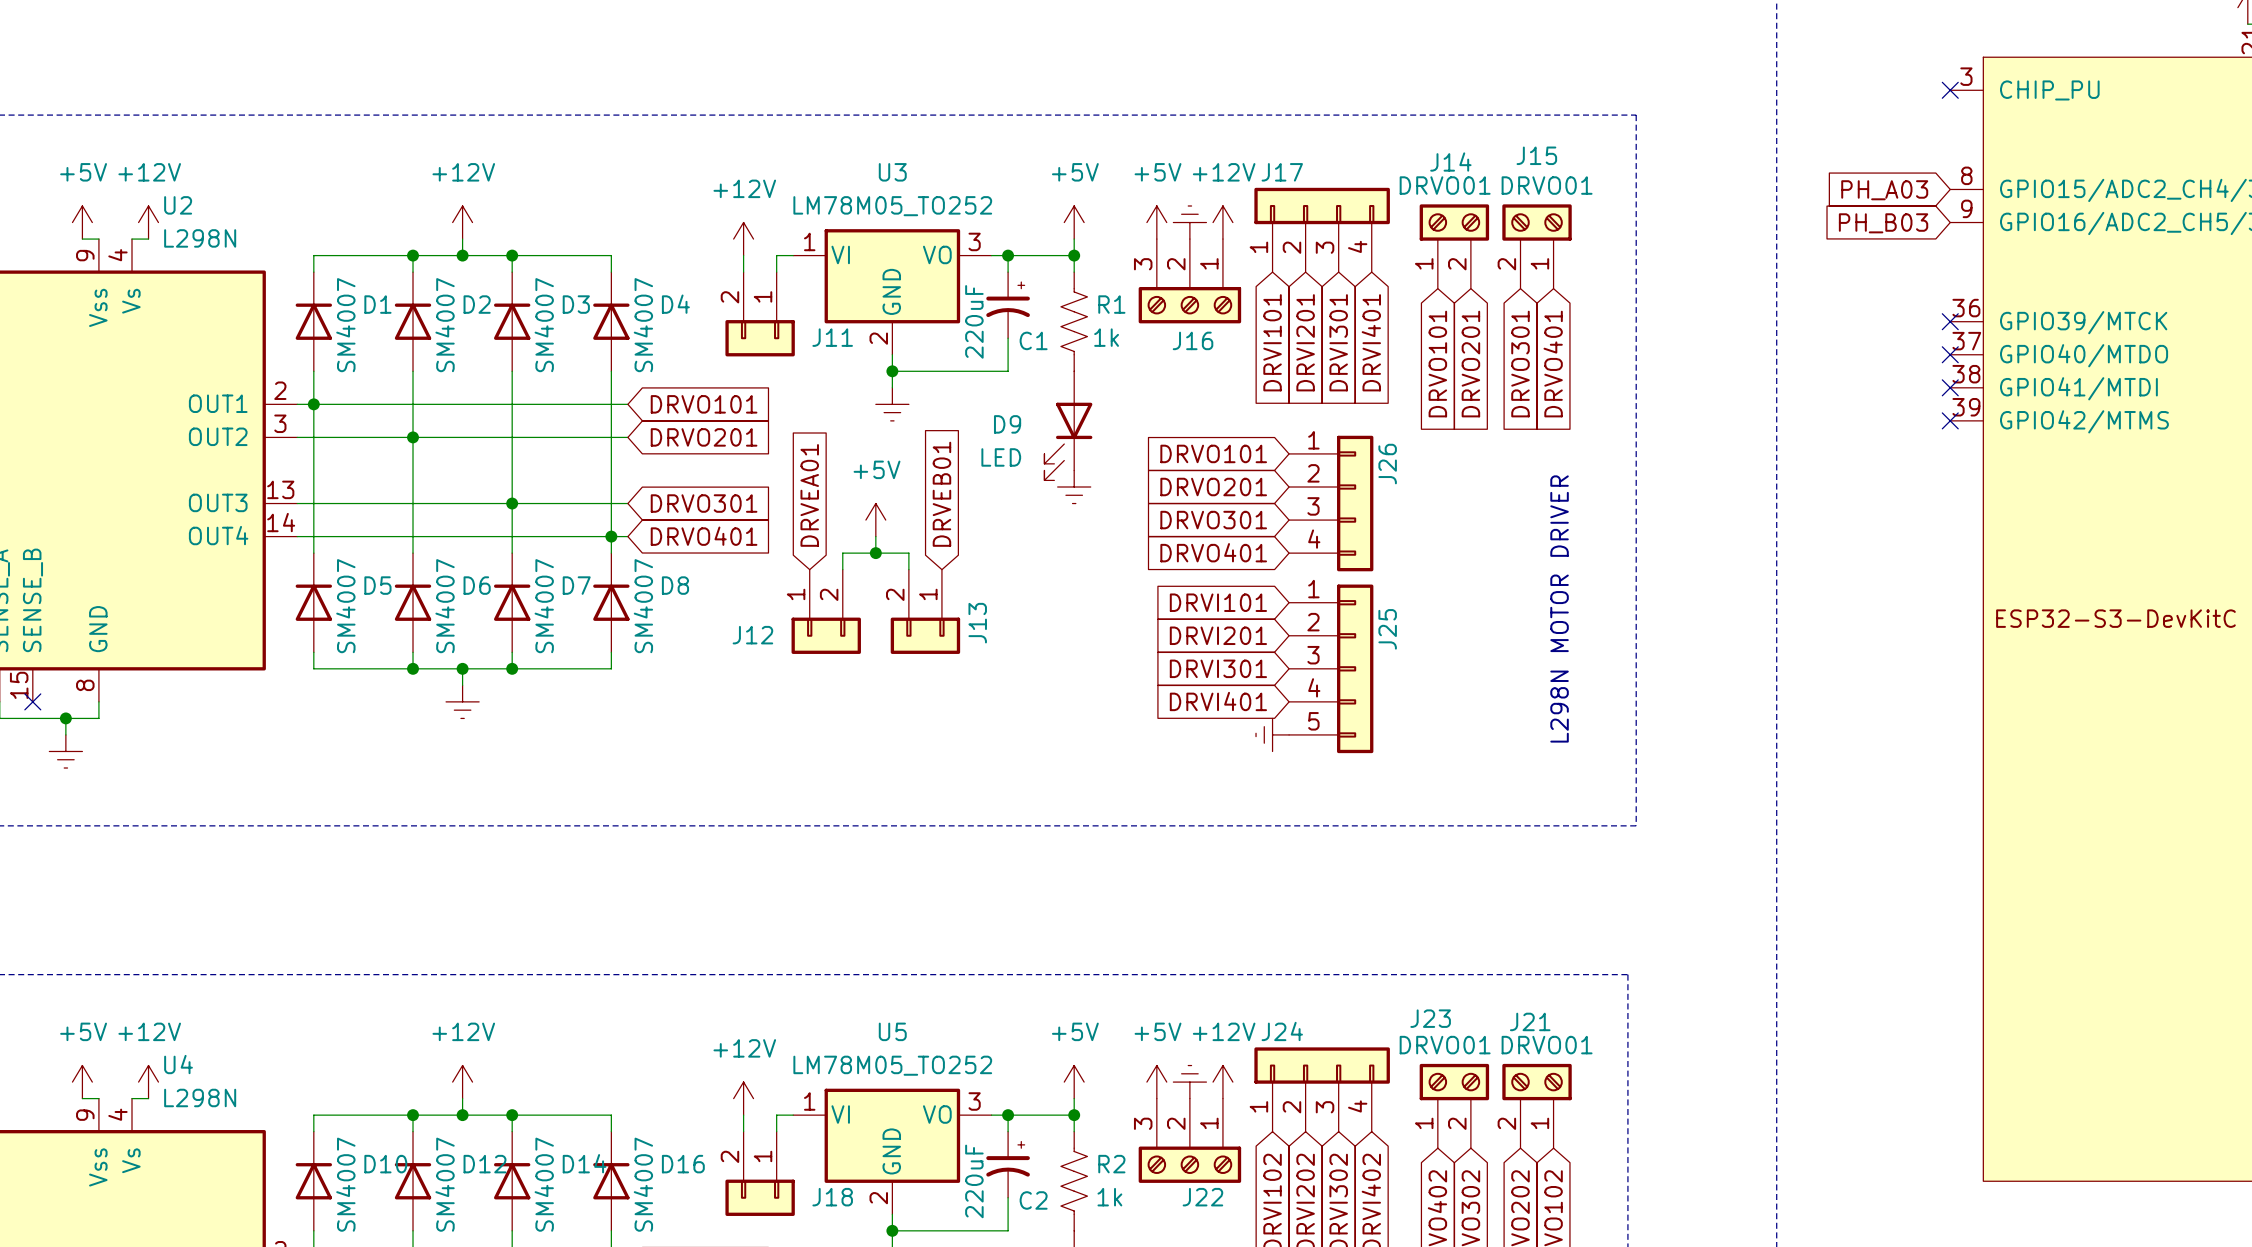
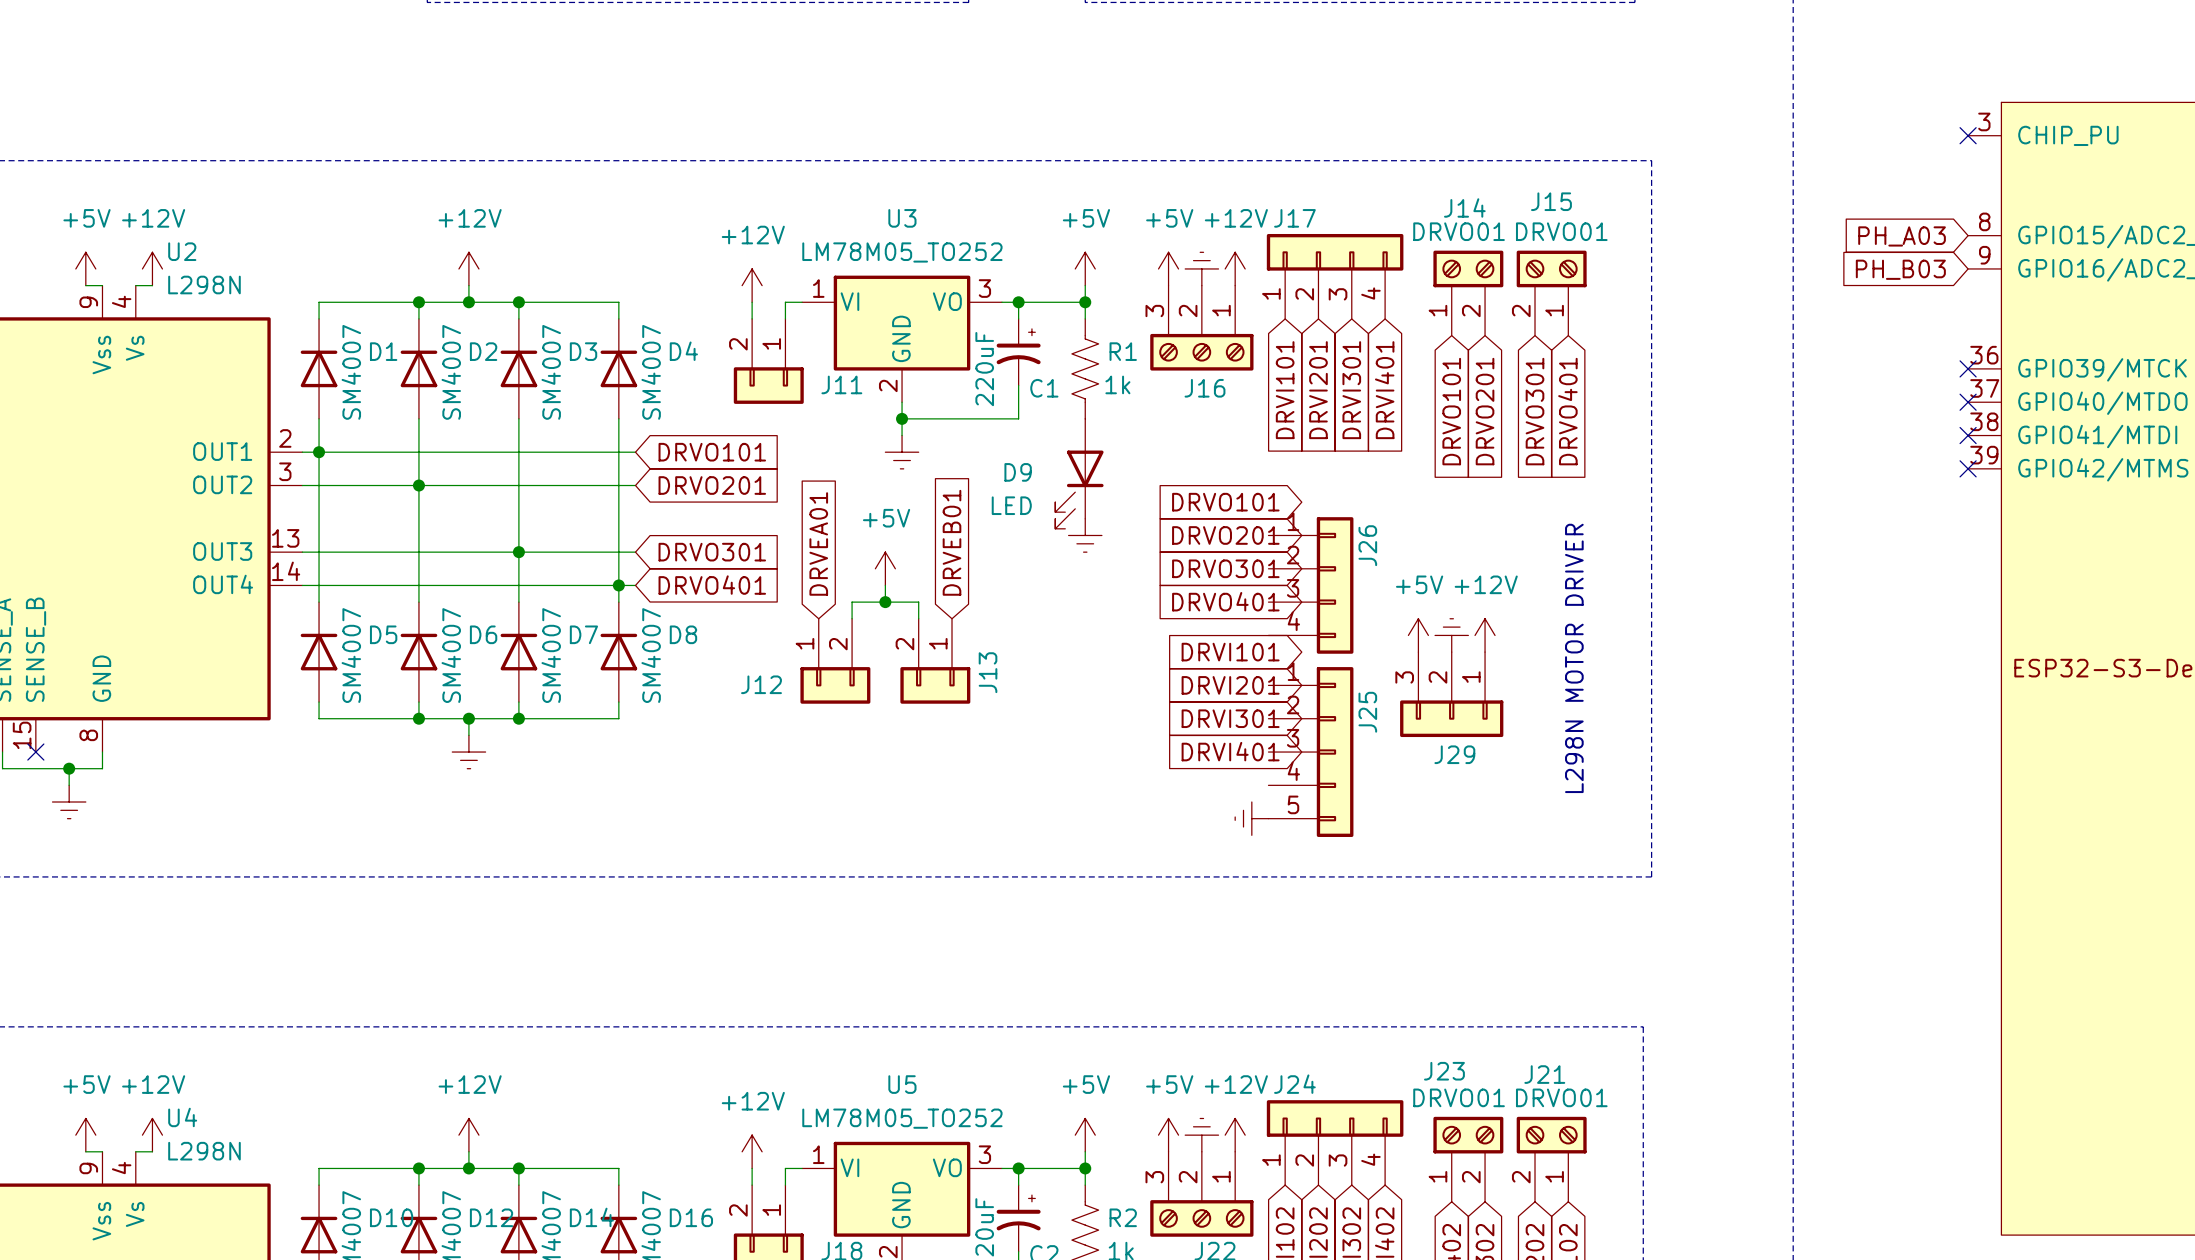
J26 position: (1331, 503) -> (1310, 585)
power symbol: none -> +5V (1418, 635)
power symbol: none -> (1451, 635)
power symbol: none -> +12V (1485, 635)
J29: none -> (1451, 694)
J25 position: (1331, 668) -> (1310, 752)
power symbol position: (1272, 734) -> (1251, 818)

